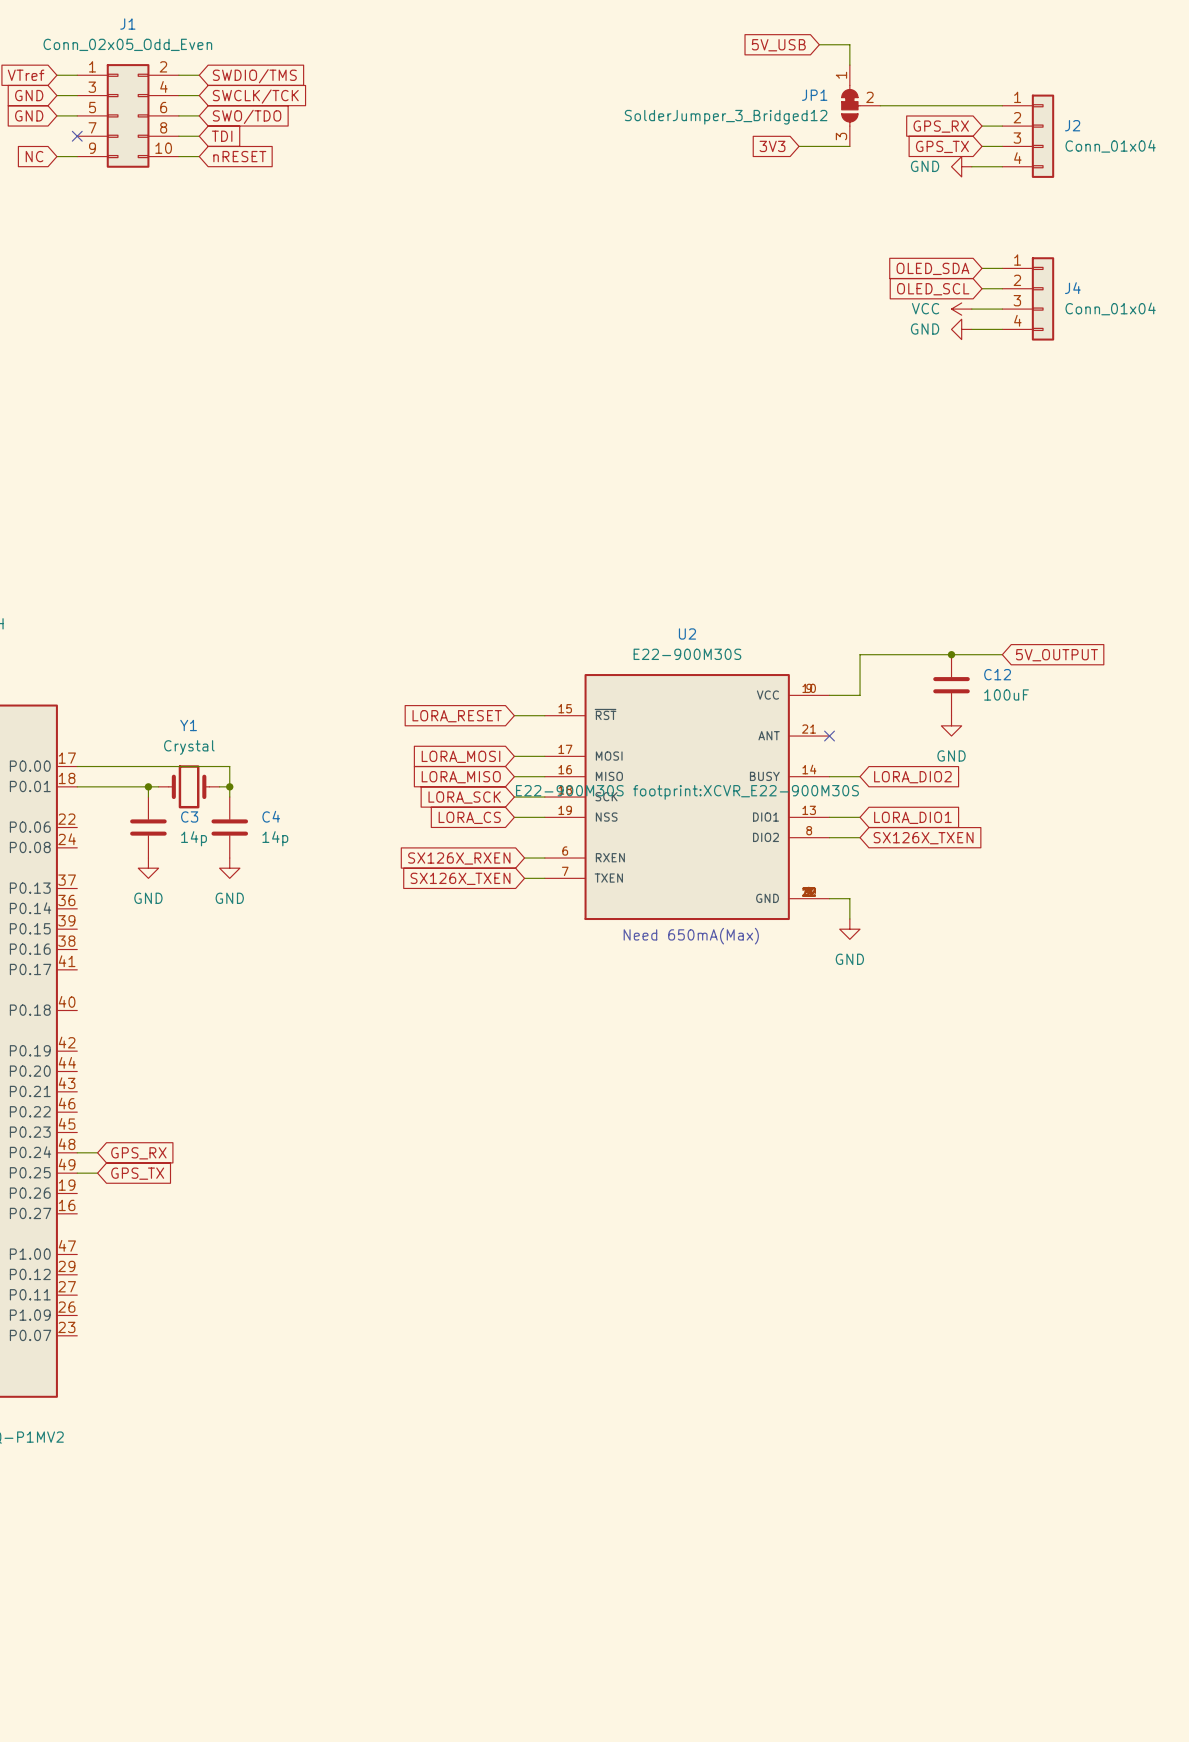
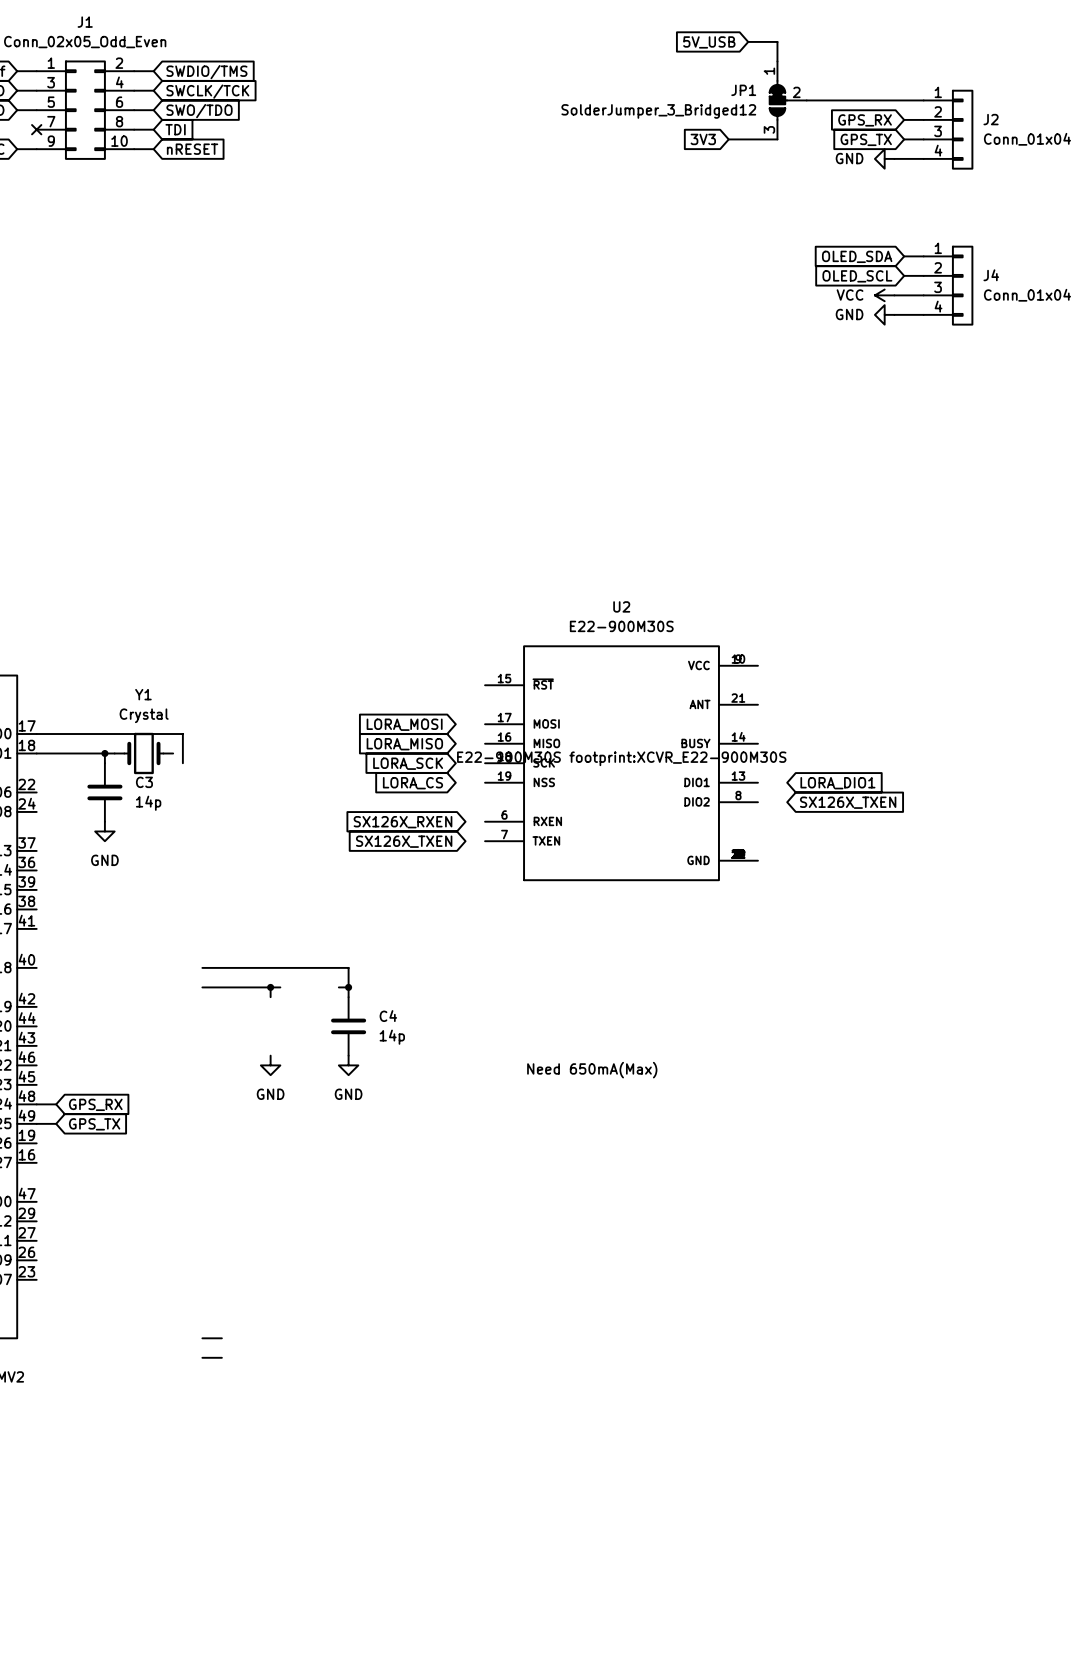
junction: (951, 654) -> none
wire: (1002, 654) (860, 654) (860, 695) (829, 695) -> none
global label: 5V_OUTPUT (1056, 655) -> none
C12: 100uF (951, 685) -> none
wire: (514, 715) (544, 715) -> none
global label: LORA_RESET (457, 716) -> none
power symbol: GND (951, 725) -> none
no-connect mark: (829, 736) -> none
wire: (514, 756) (544, 756) -> none
wire: (514, 776) (544, 776) -> none
wire: (829, 776) (860, 776) -> none
global label: LORA_DIO2 (912, 777) -> none
wire: (219, 786) (229, 786) -> none
junction: (229, 786) -> none
wire: (514, 797) (544, 797) -> none
wire: (514, 817) (544, 817) -> none
wire: (829, 817) (860, 817) -> none
C4 position: (229, 827) -> (348, 1026)
wire: (829, 837) (860, 837) -> none
wire: (524, 858) (544, 858) -> none
power symbol: GND (229, 868) -> none
wire: (524, 878) (544, 878) -> none
wire: (829, 898) (849, 898) (849, 919) -> none
power symbol: GND (849, 929) -> none
text position: Need 650mA(Max) (691, 936) -> Need 650mA(Max) (592, 1070)
wire: none -> (202, 967) (348, 967) (348, 997)
wire: none -> (202, 987) (280, 987)
wire: none -> (270, 987) (270, 997)
junction: none -> (270, 987)
wire: none -> (338, 987) (348, 987)
junction: none -> (348, 987)
power symbol: none -> GND (270, 1065)
power symbol: none -> GND (348, 1065)
wire: none -> (202, 1338) (221, 1338)
wire: none -> (202, 1357) (221, 1357)

